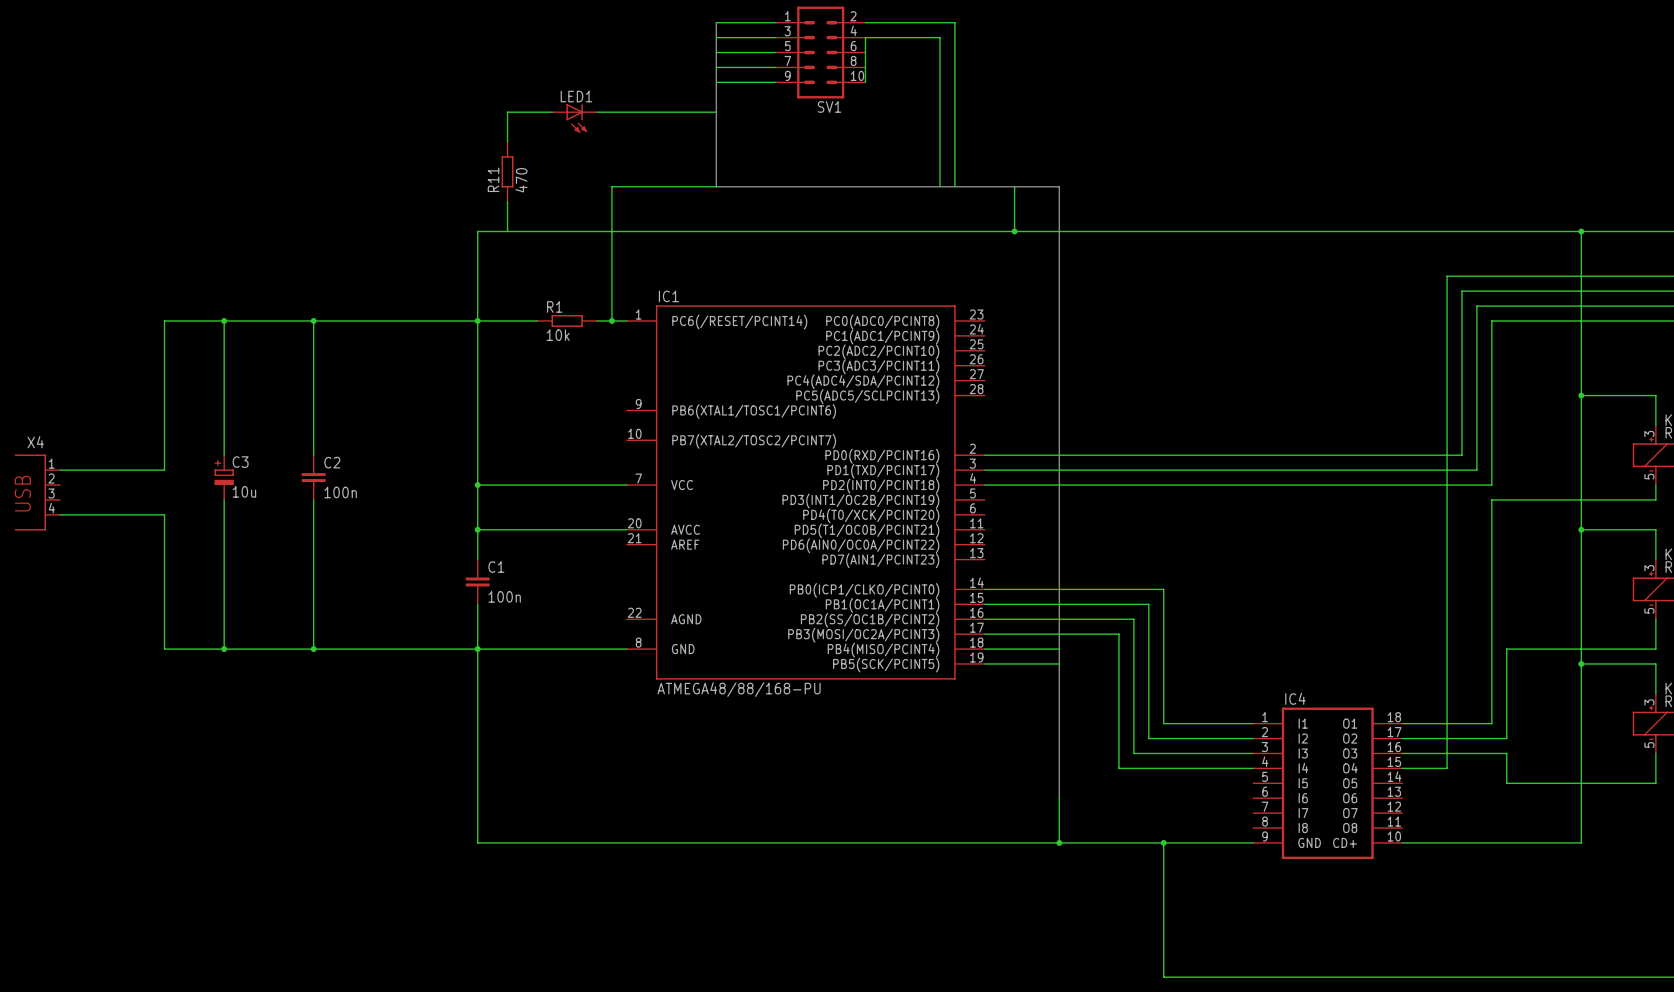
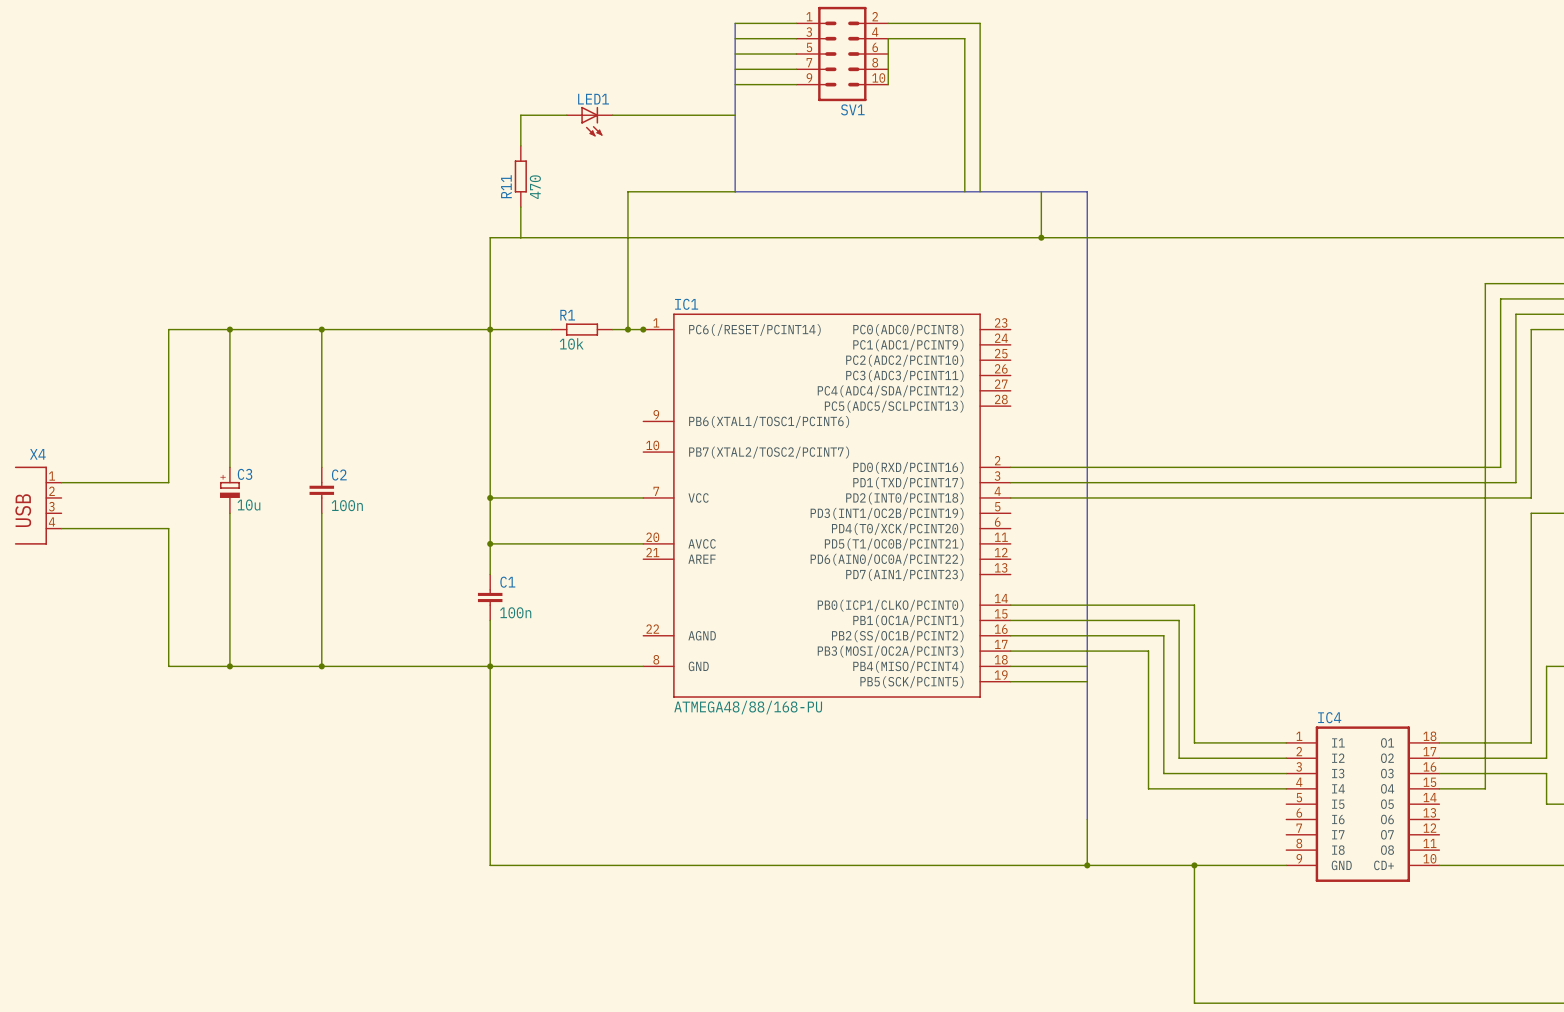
junction: none -> (643, 329)

